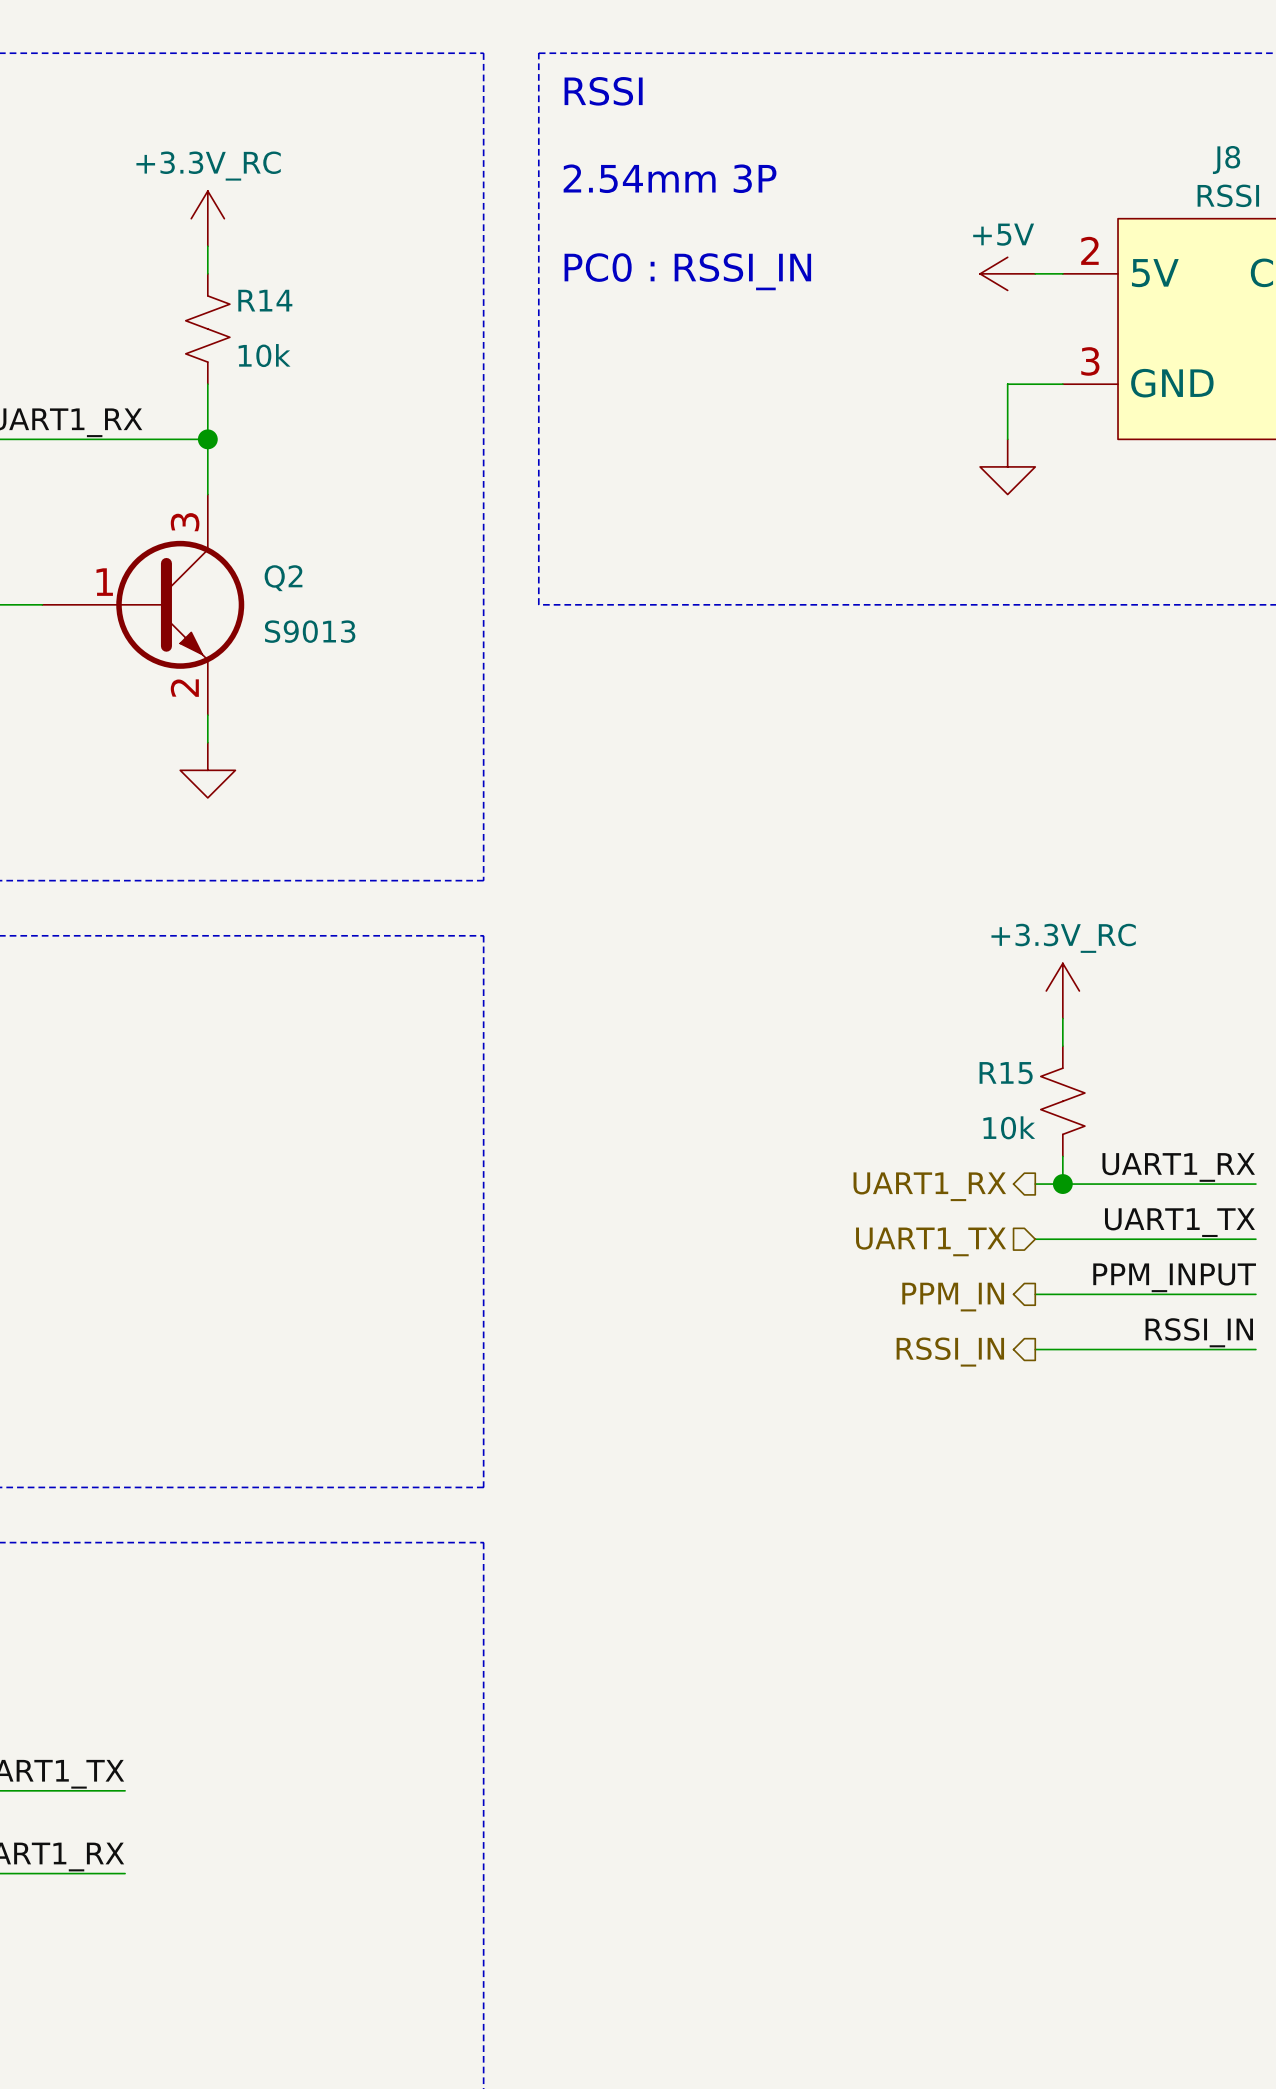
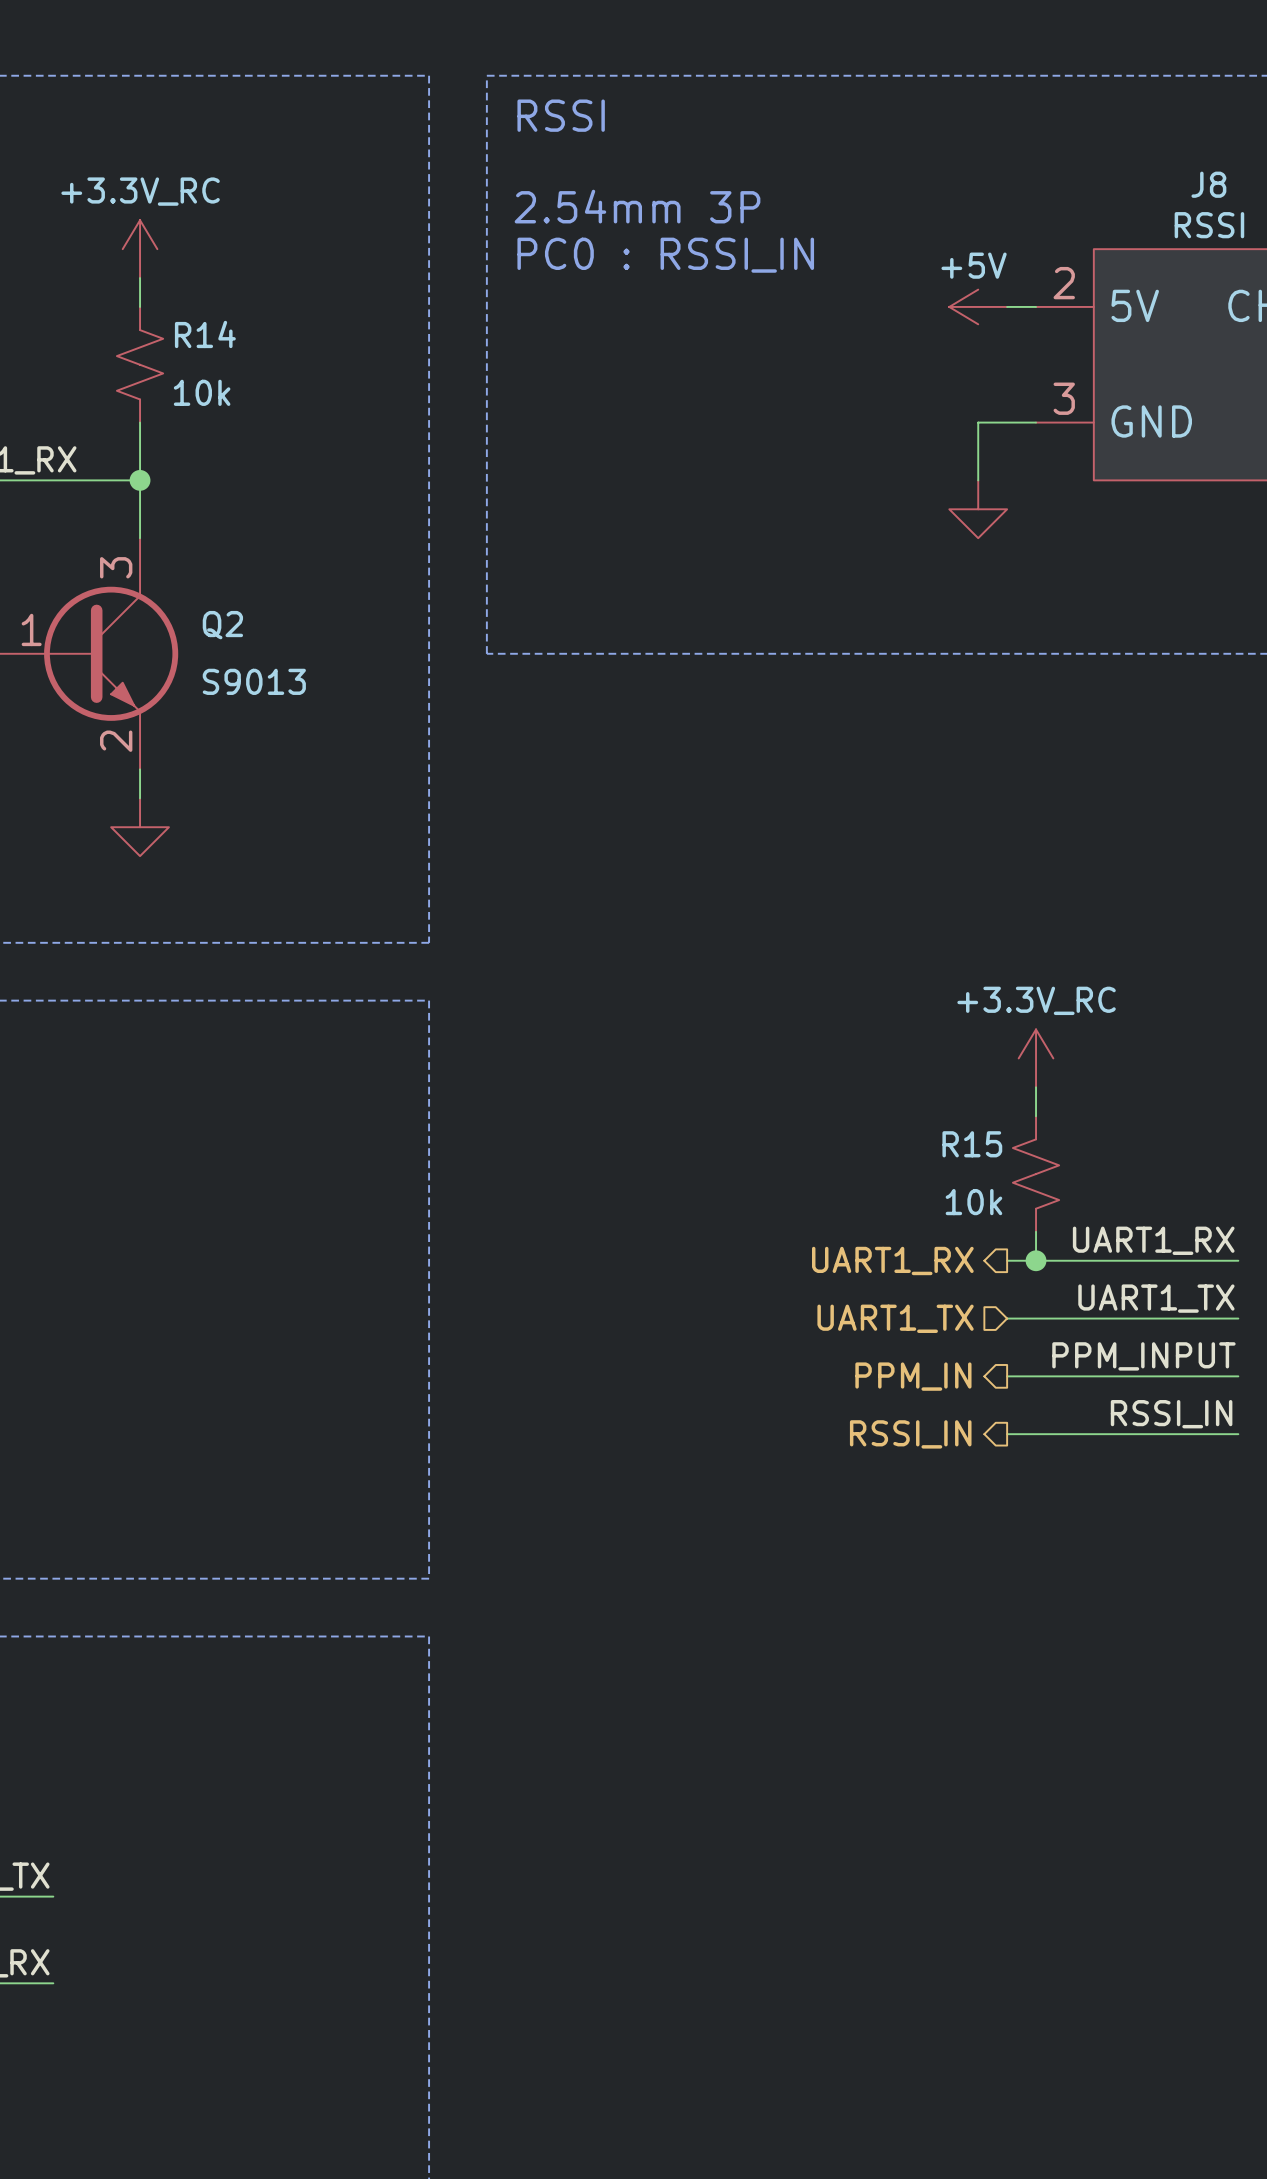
text position: PC0 : RSSI_IN (687, 271) -> PC0 : RSSI_IN (665, 255)

